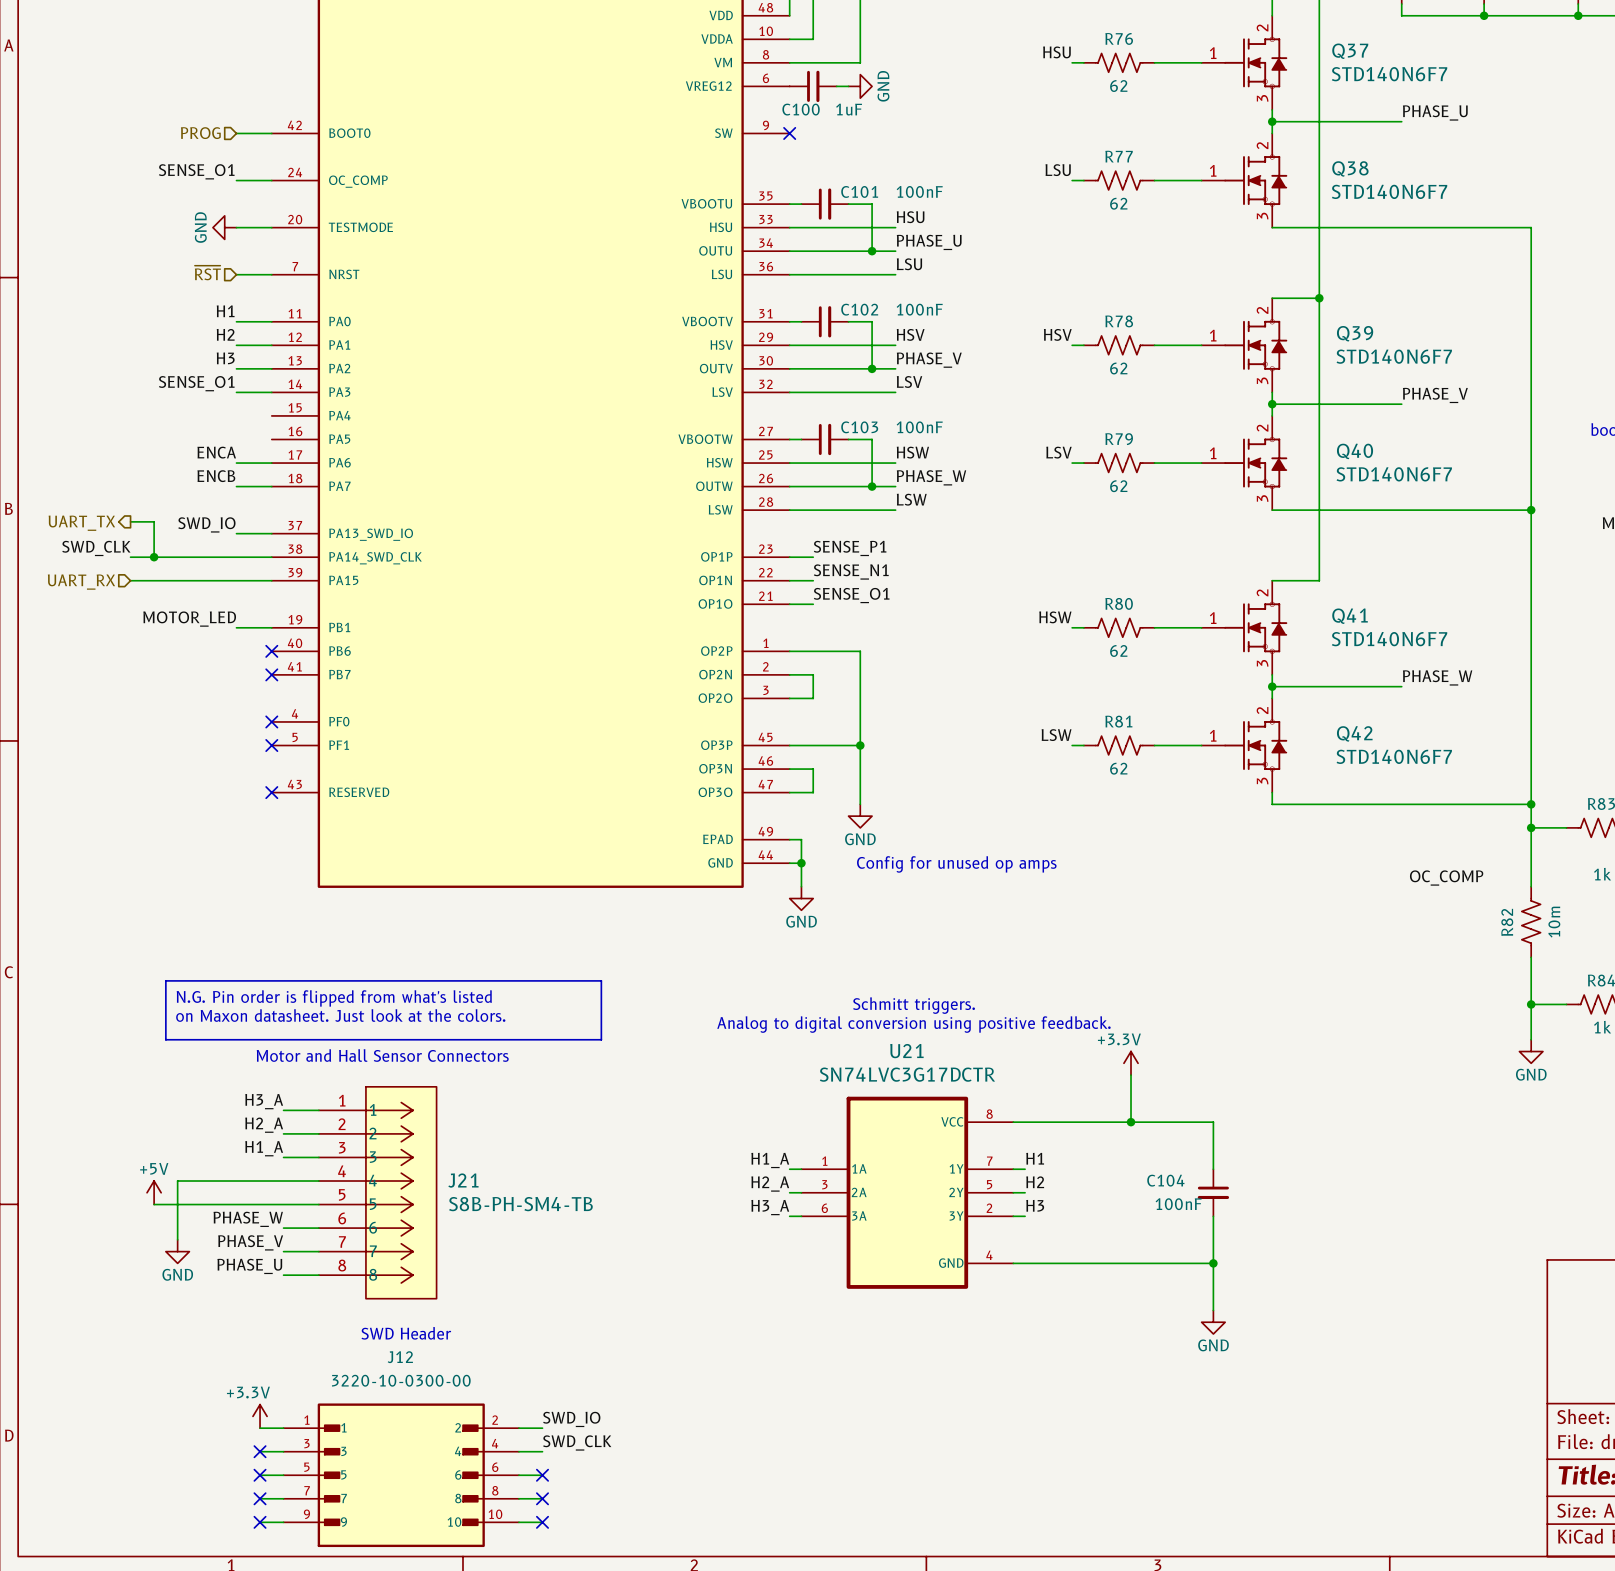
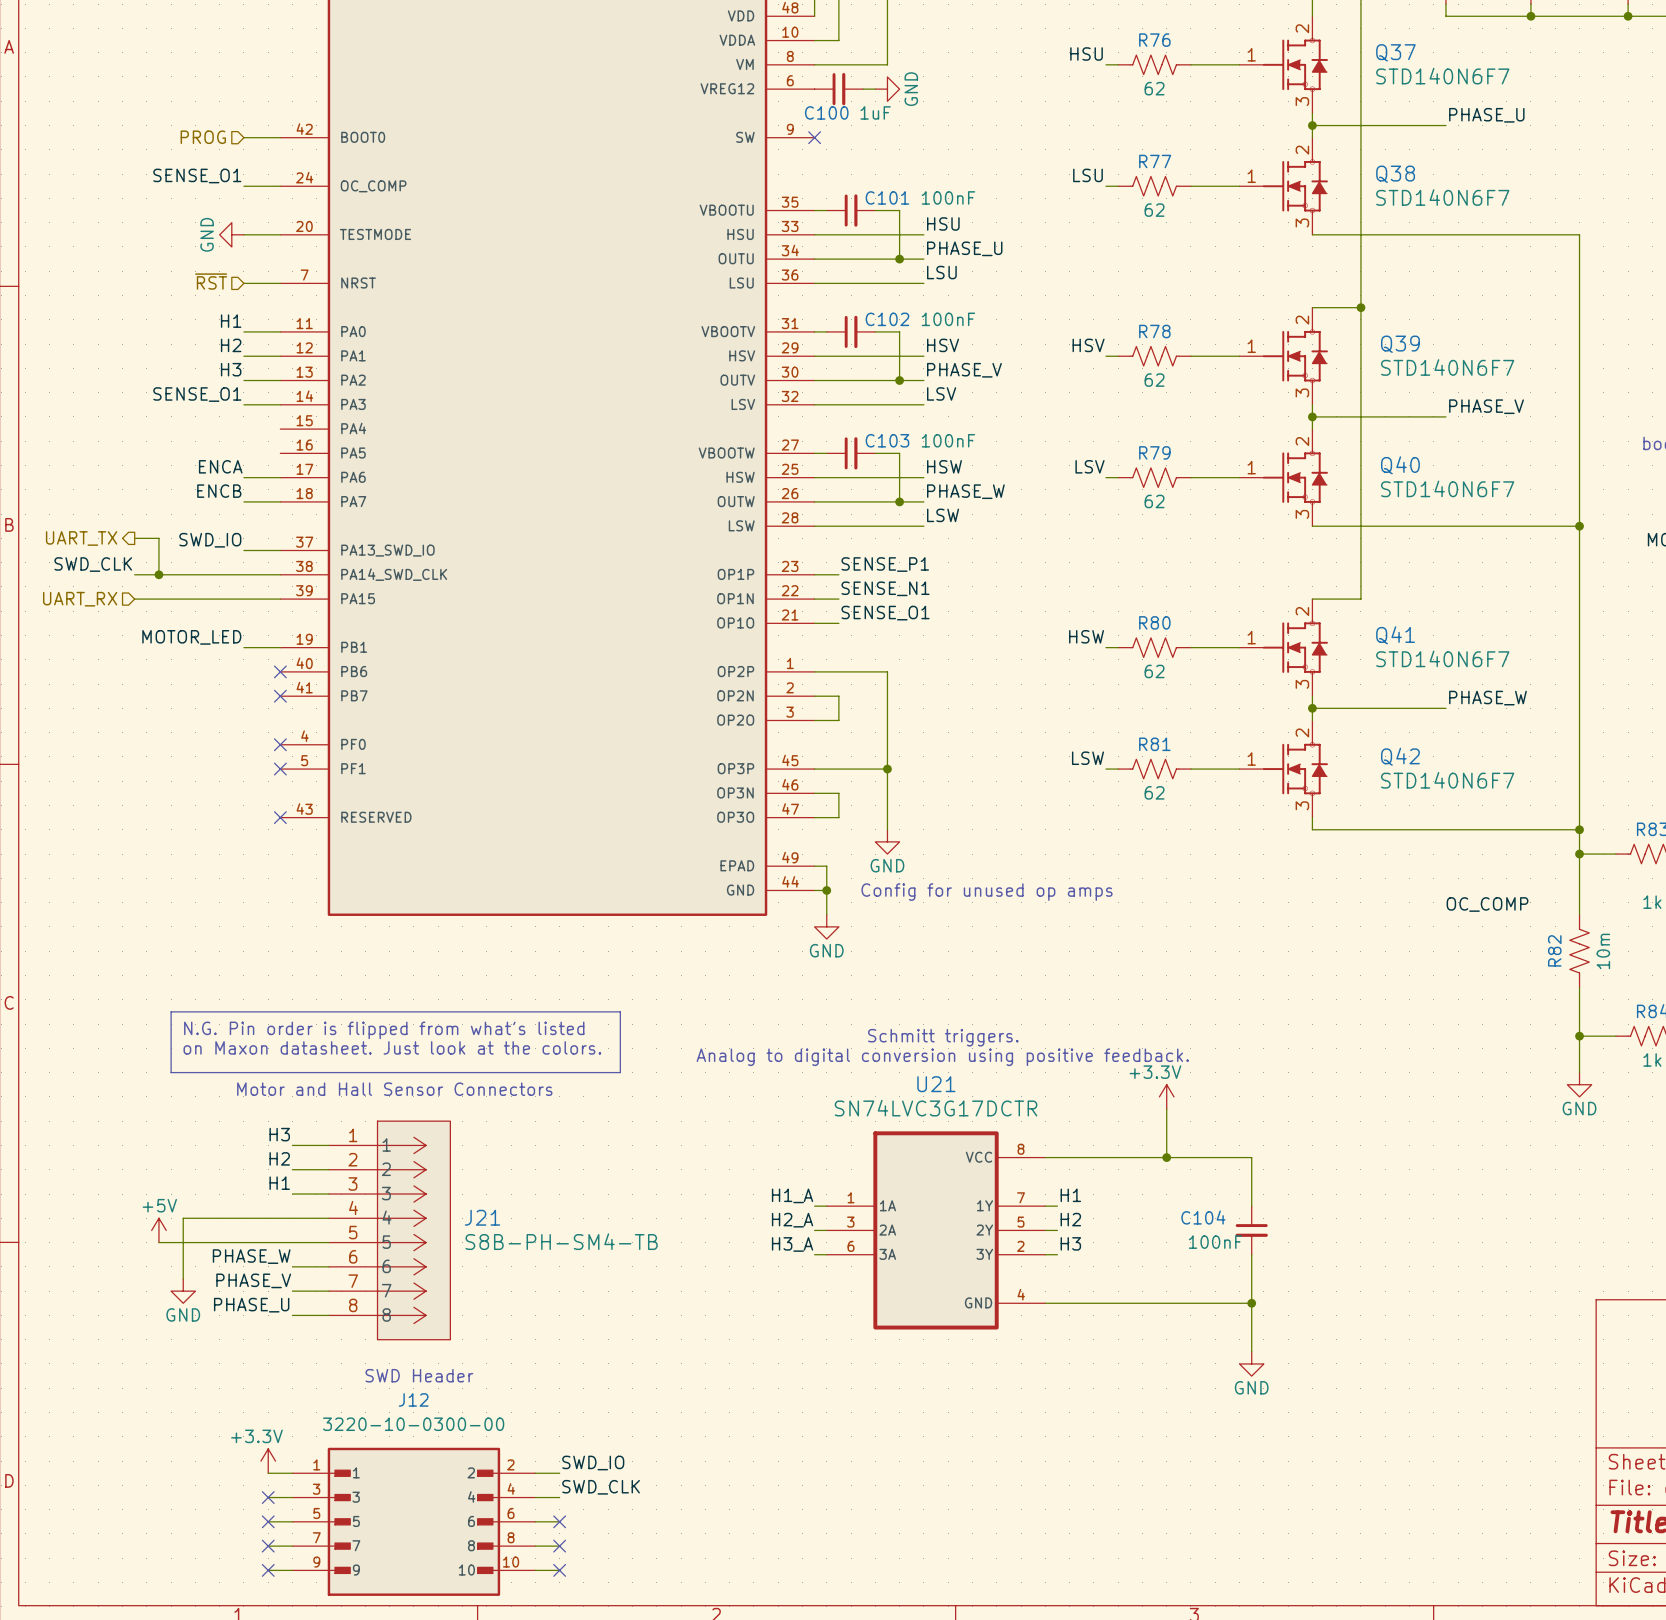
label: H3_A (264, 1101) -> H3 (279, 1134)
label: H2_A (264, 1125) -> H2 (279, 1158)
label: H1_A (264, 1148) -> H1 (279, 1183)

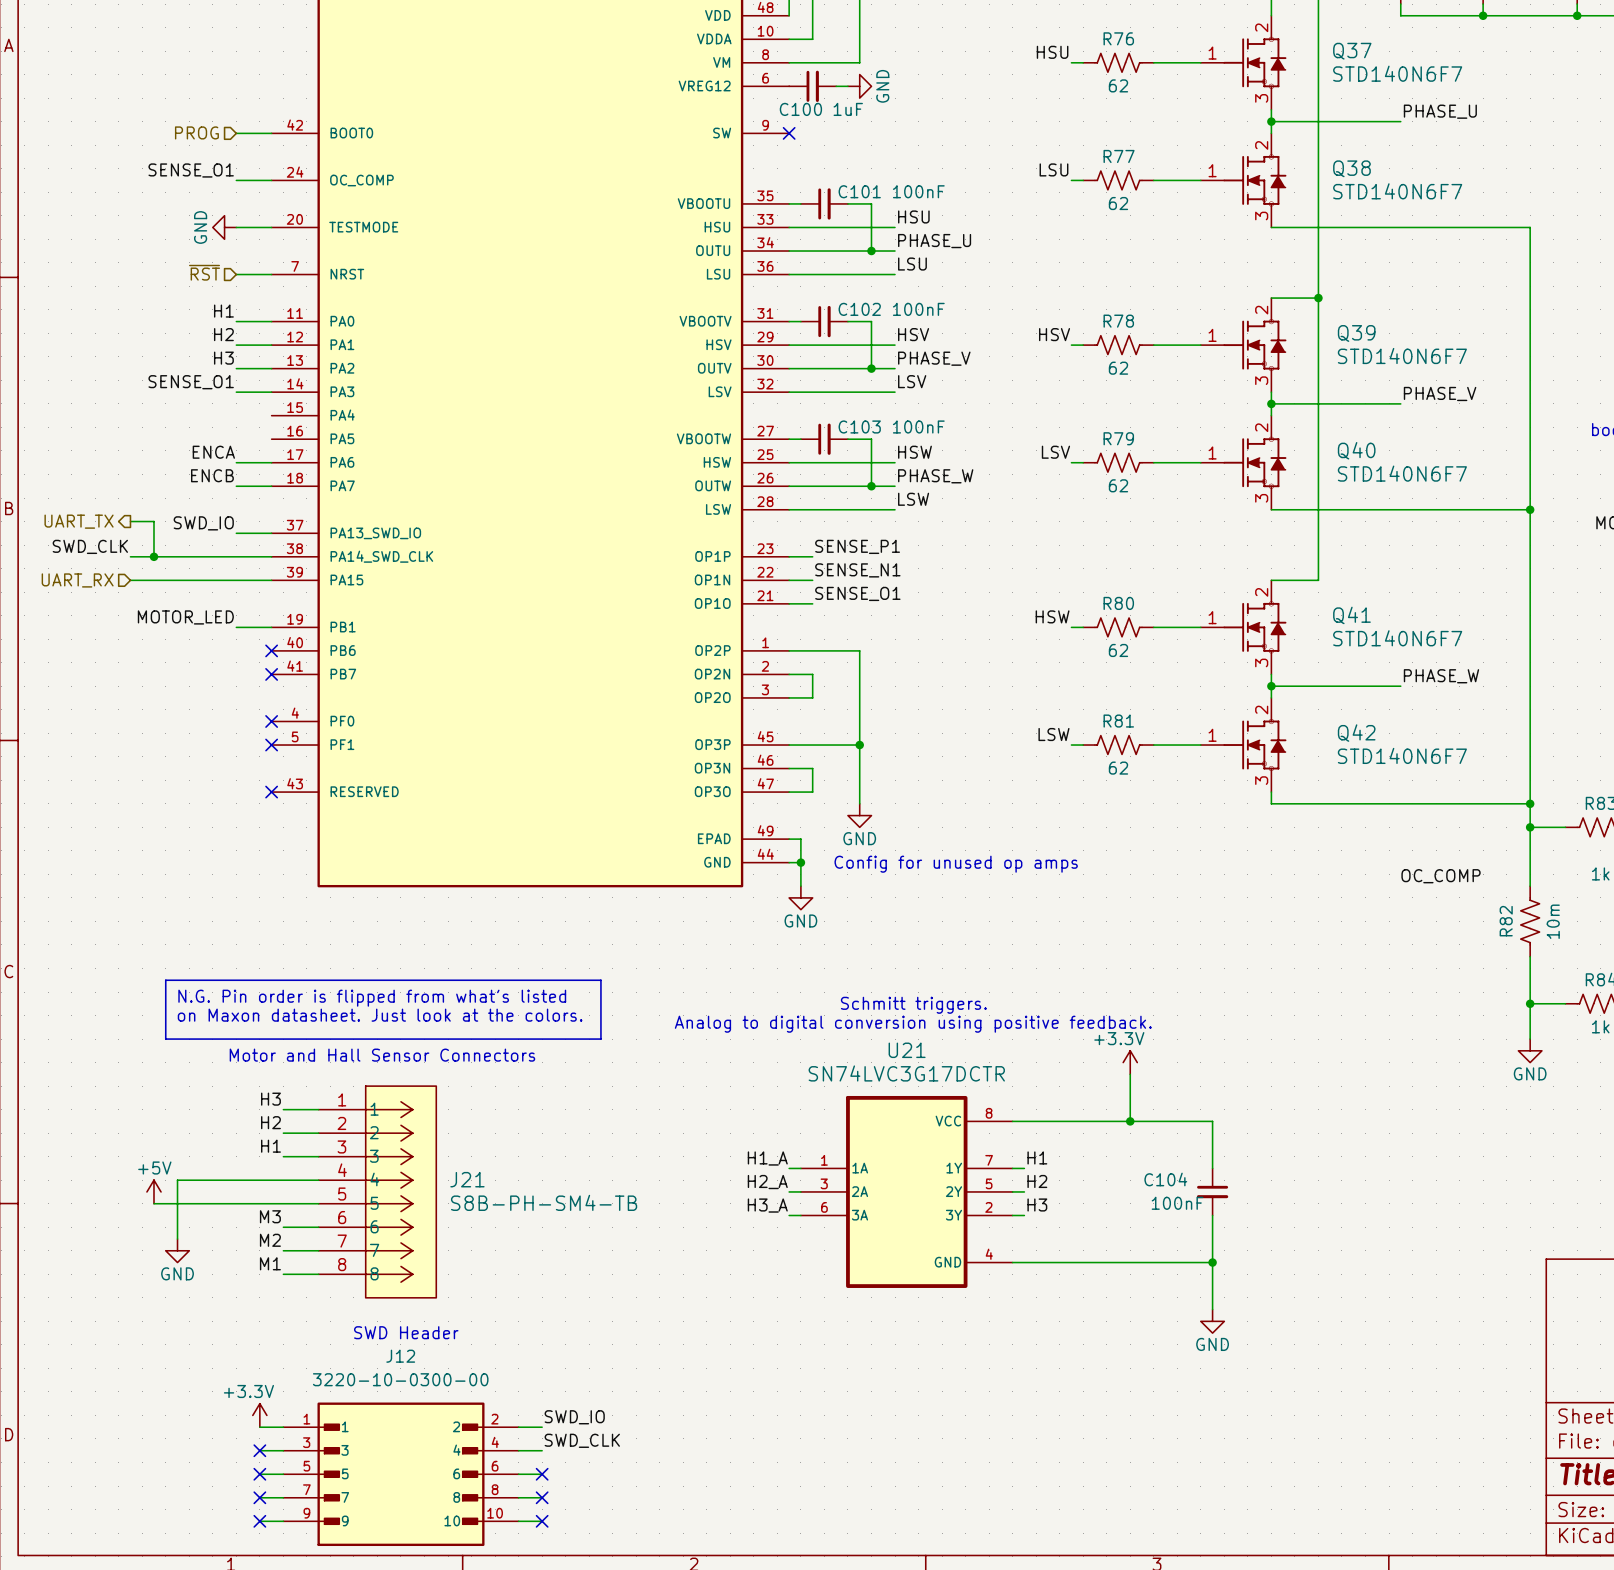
label: PHASE_W (251, 1256) -> M3 (270, 1216)
label: PHASE_V (253, 1280) -> M2 (270, 1240)
label: PHASE_U (251, 1305) -> M1 (270, 1263)

